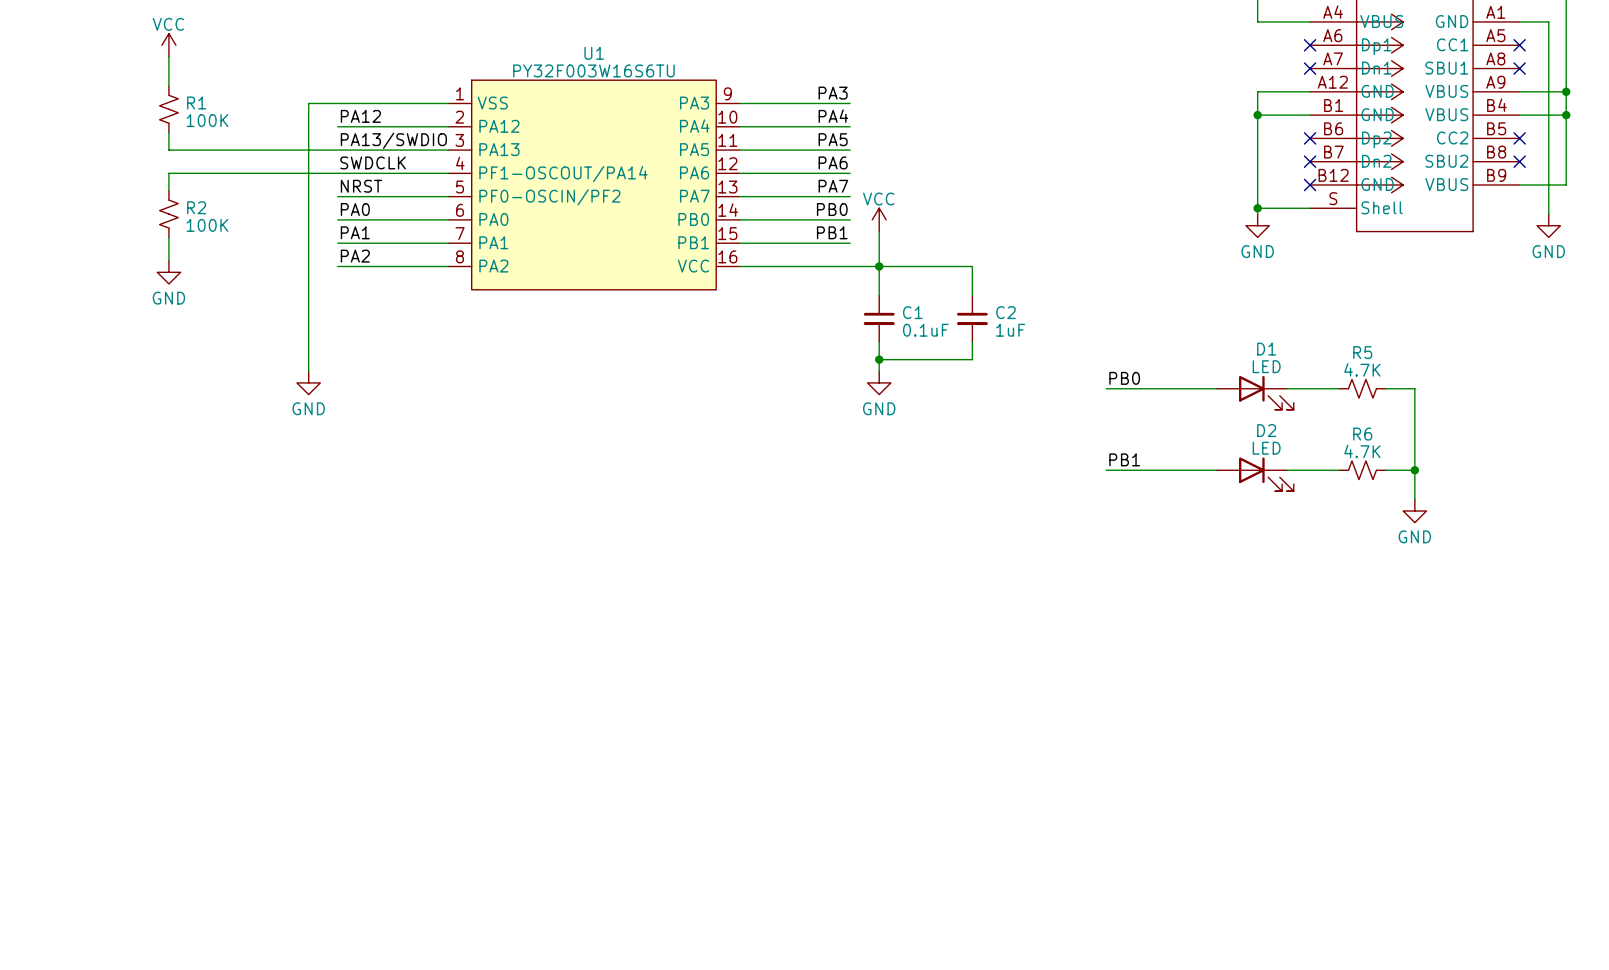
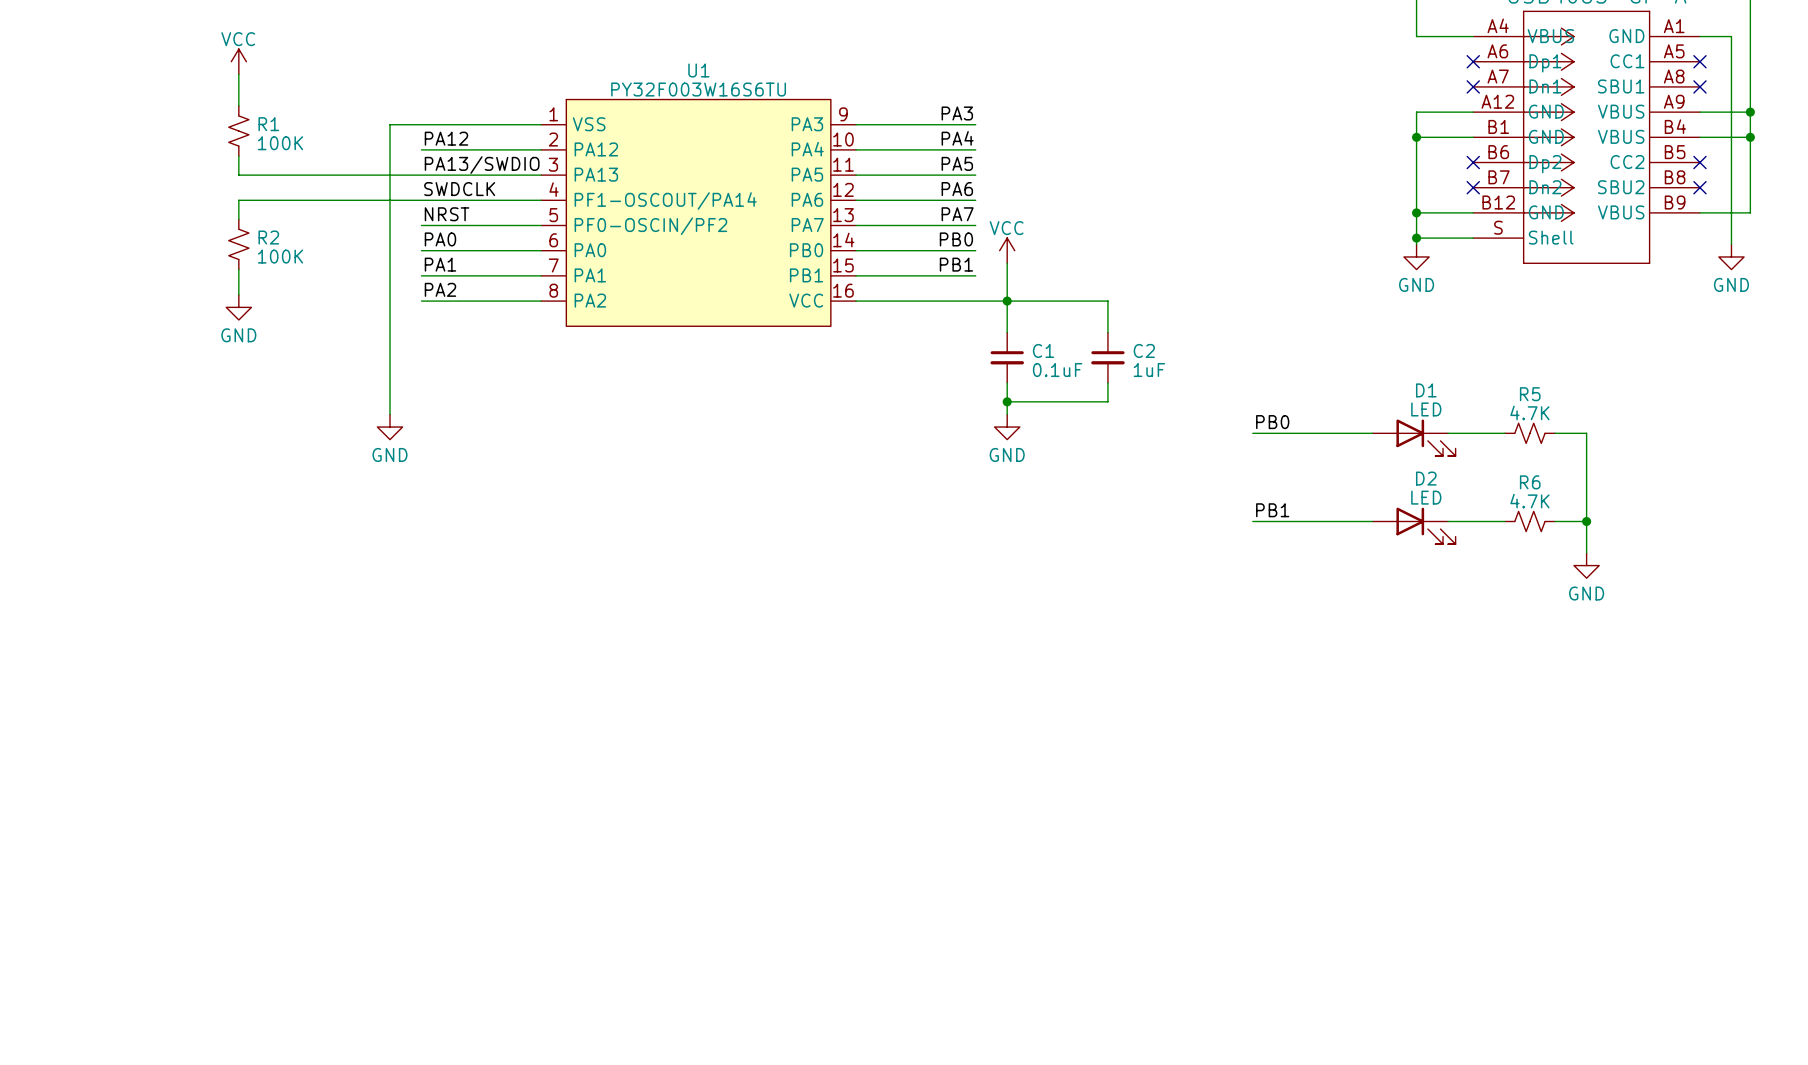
wire: none -> (1416, 212) (1473, 212)
junction: none -> (1416, 212)
no-connect mark: (1310, 184) -> none

